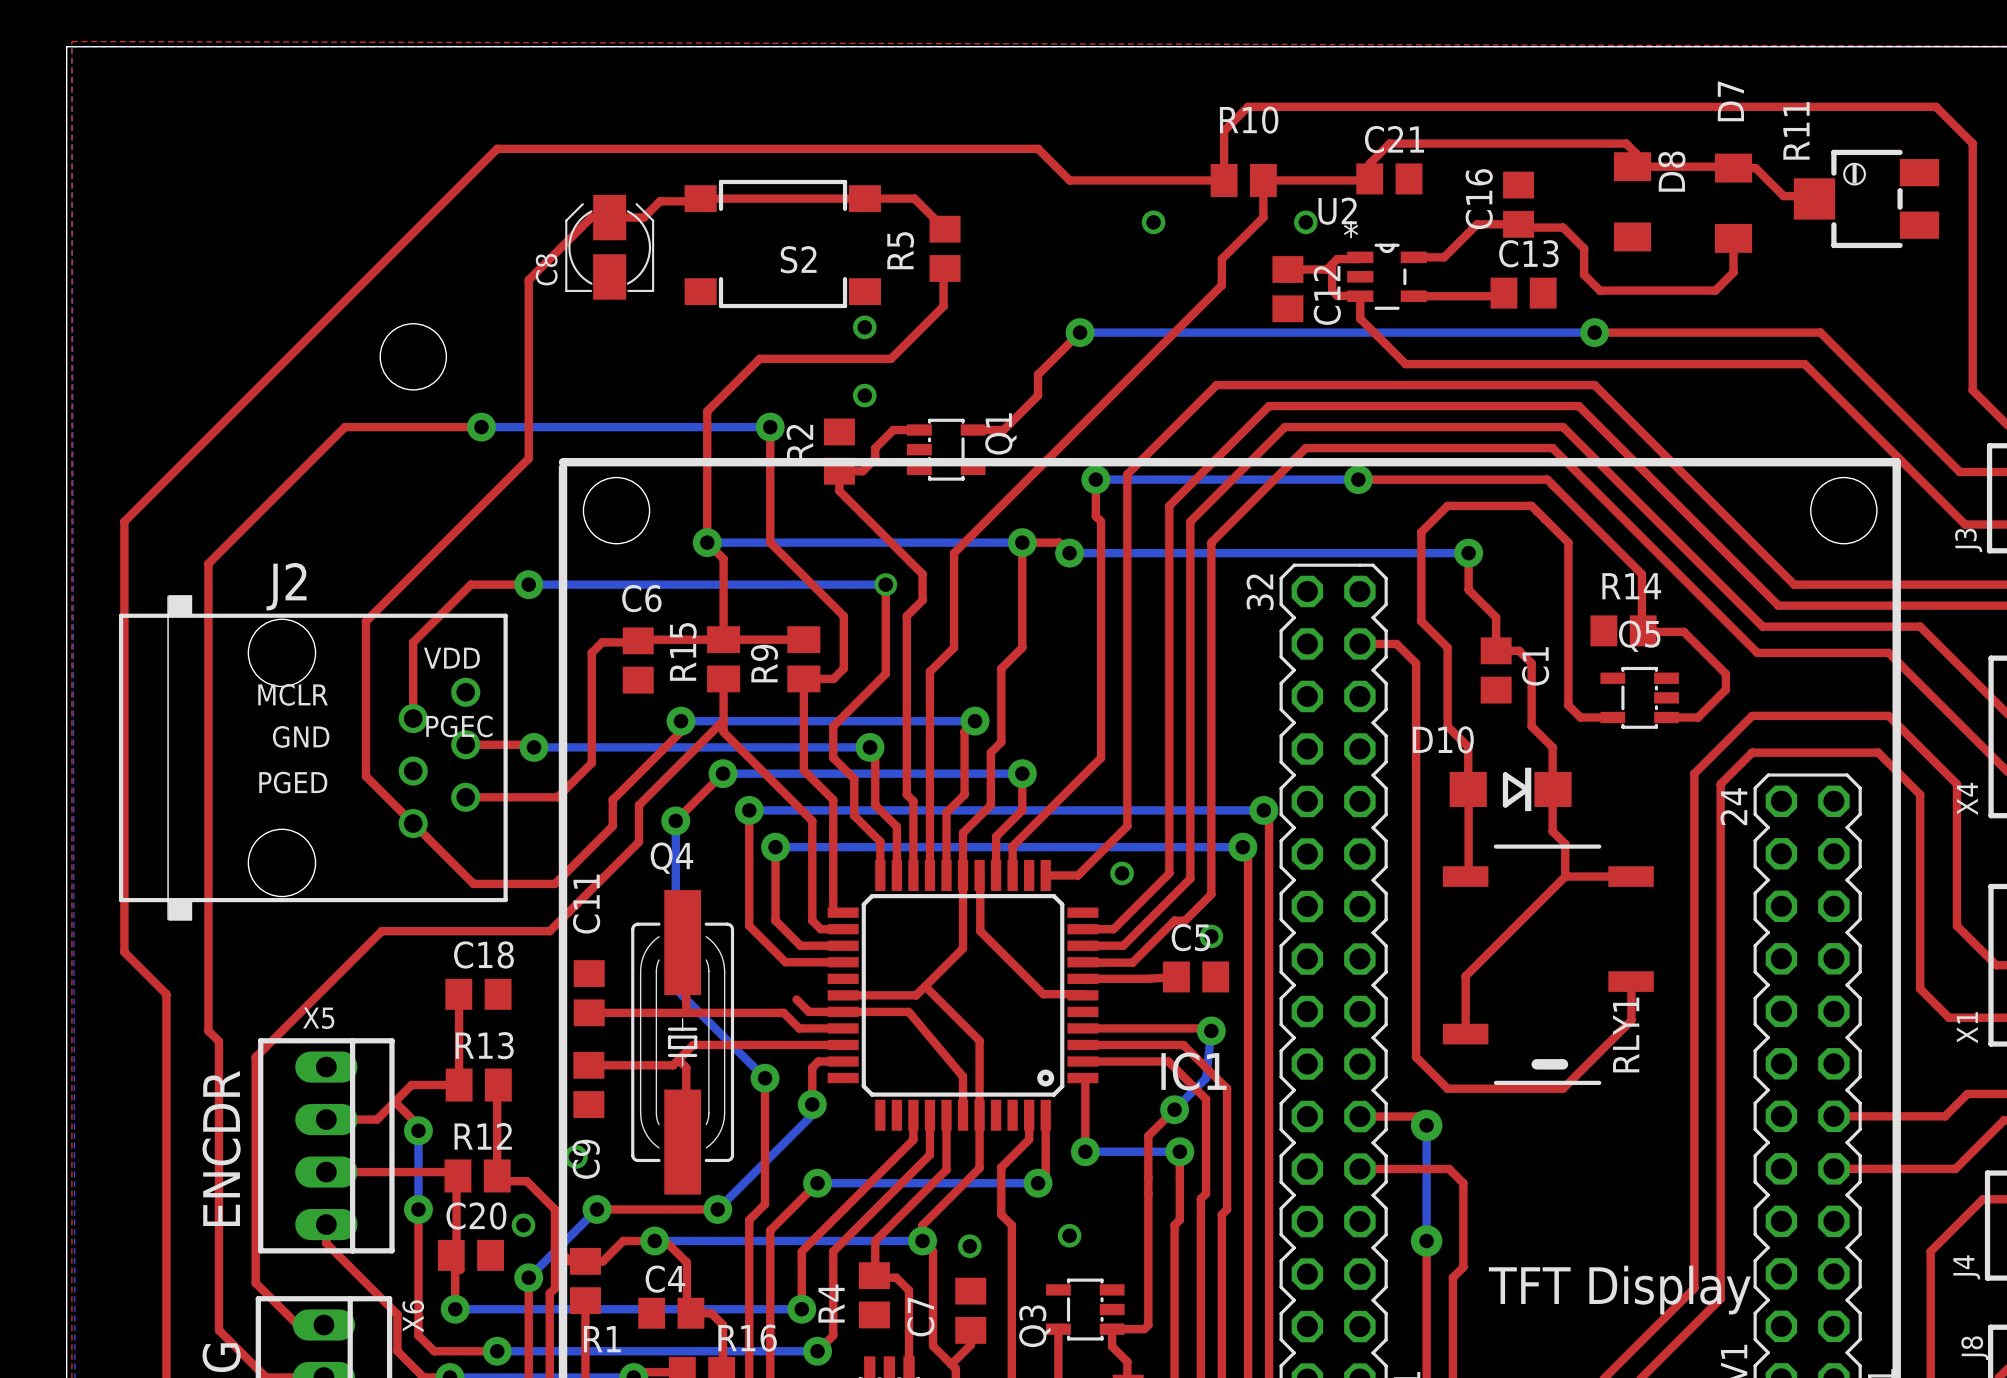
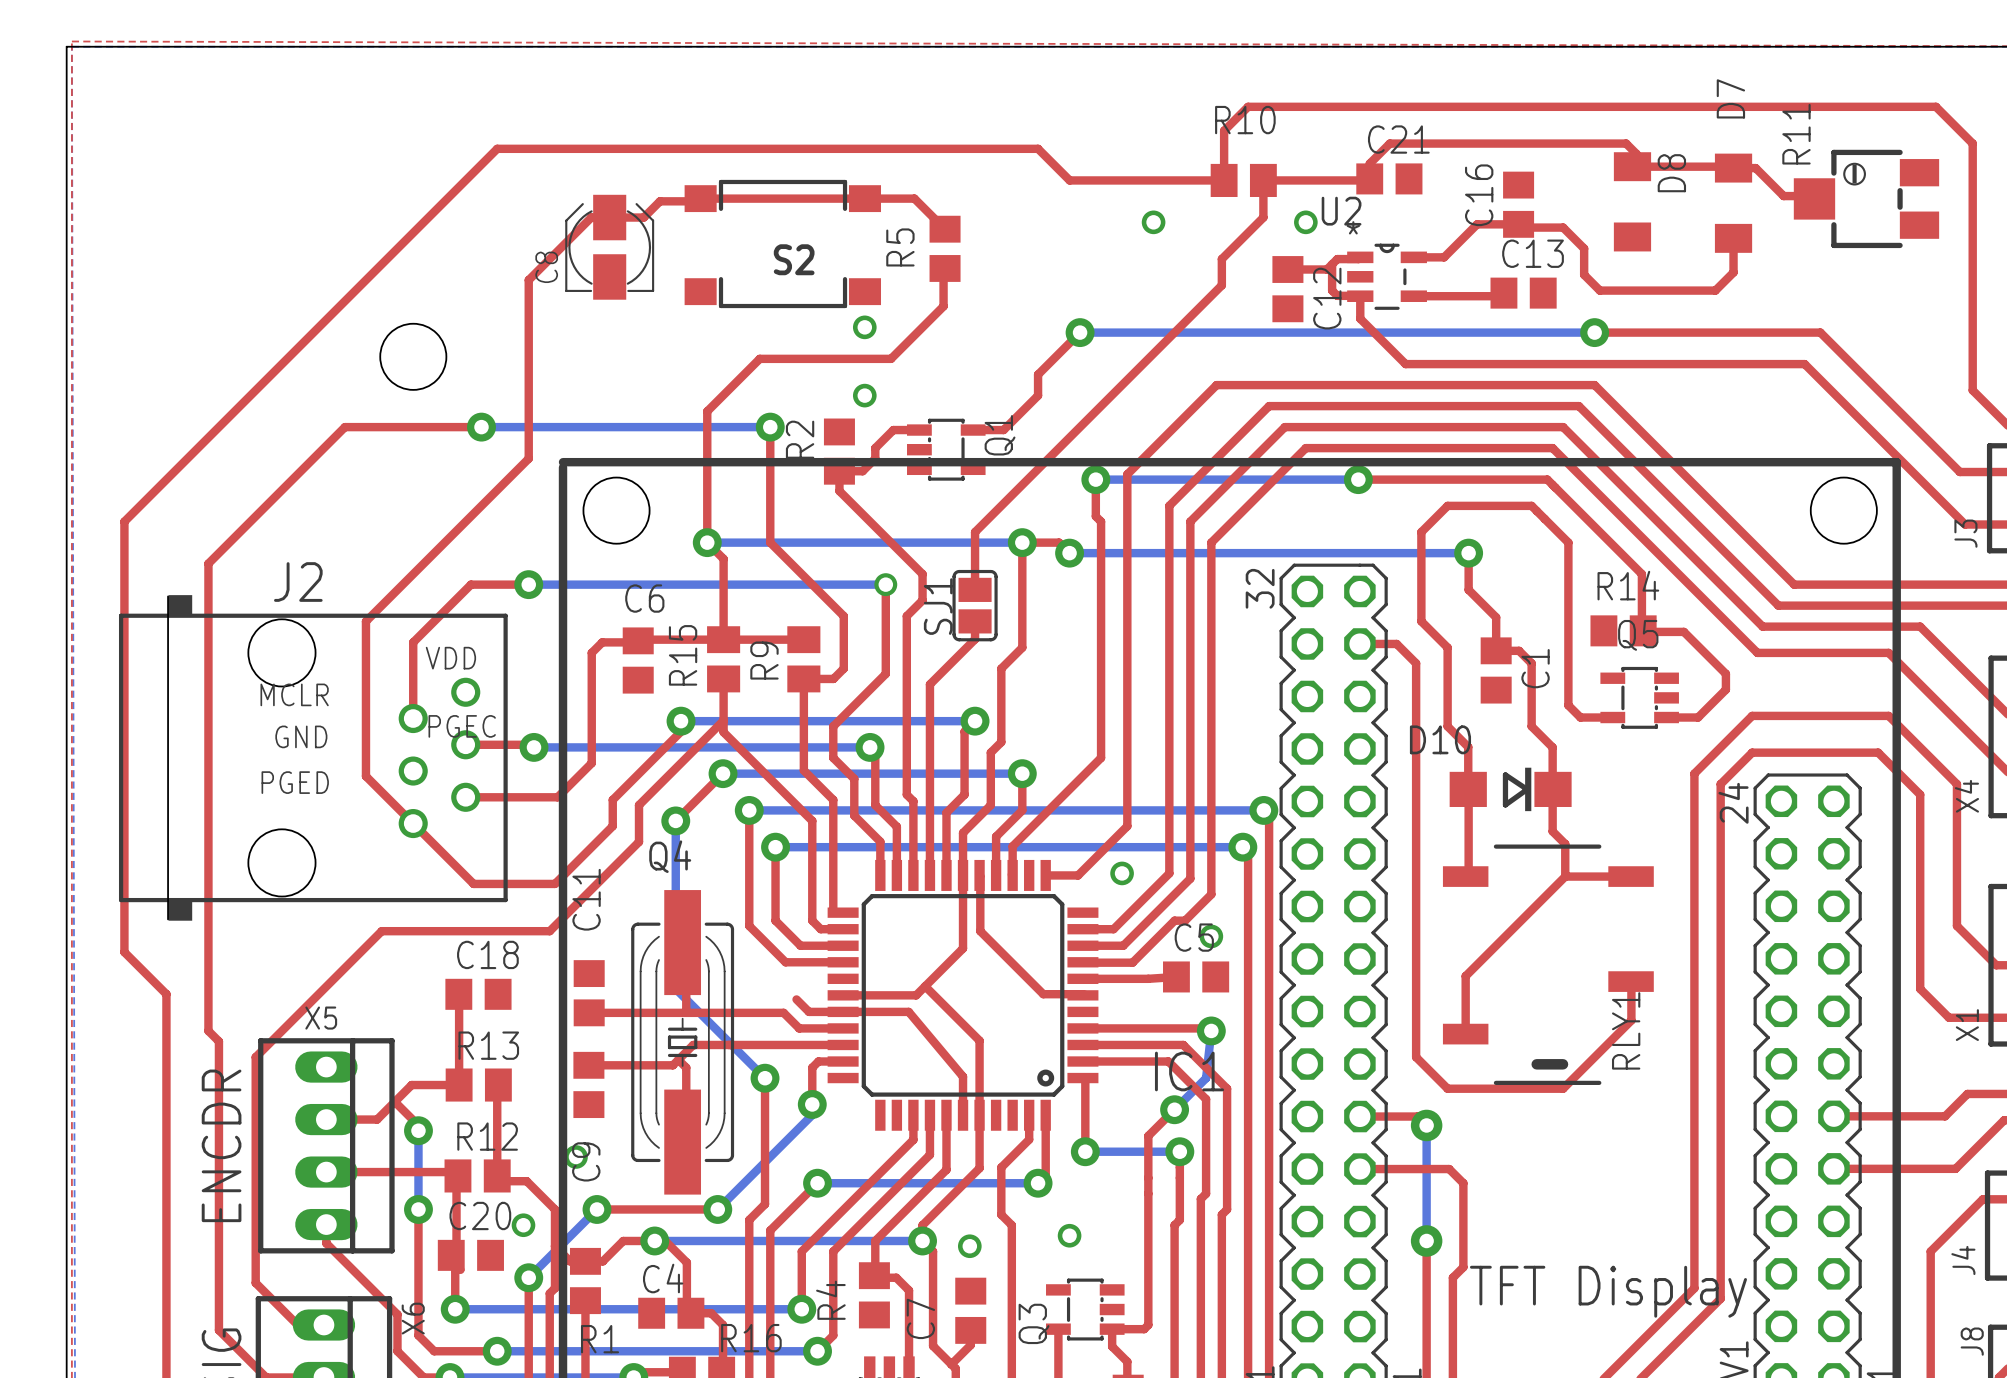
top track: (975, 532) (954, 553) (954, 647) (929, 671) (929, 684) -> (975, 621) (975, 639) (929, 684)
top track: none -> (975, 532) (975, 589)
SJ1: none -> (975, 605)

